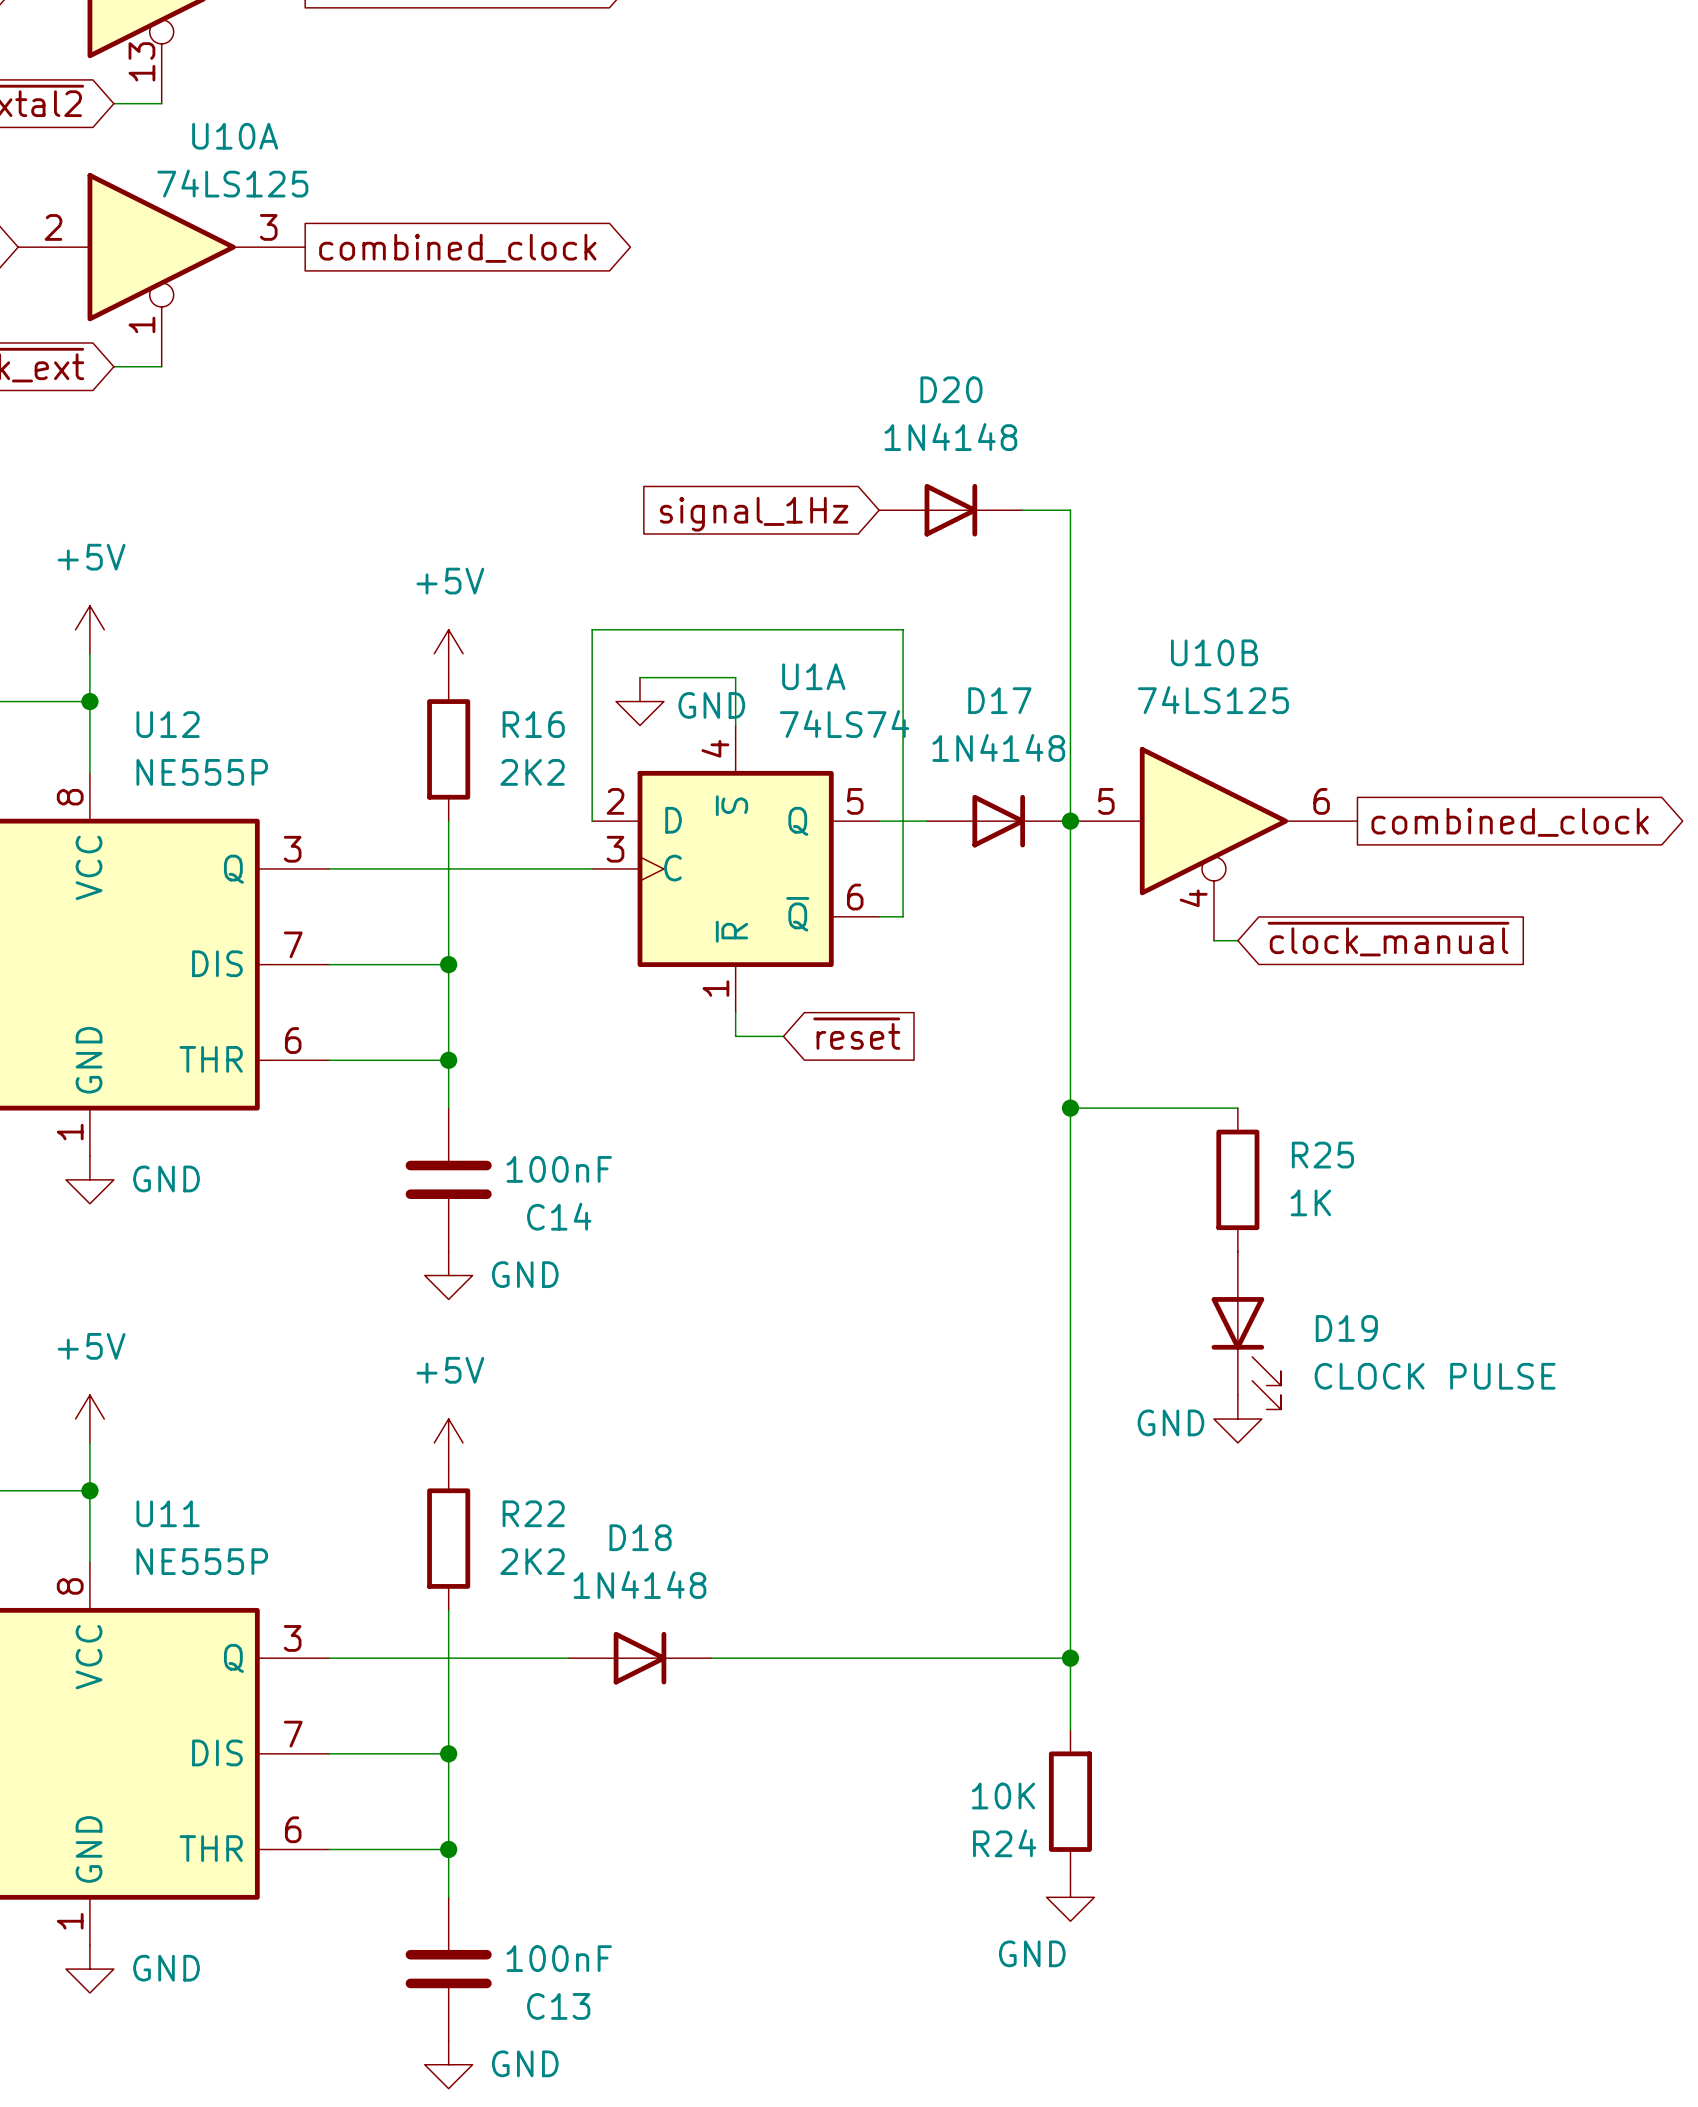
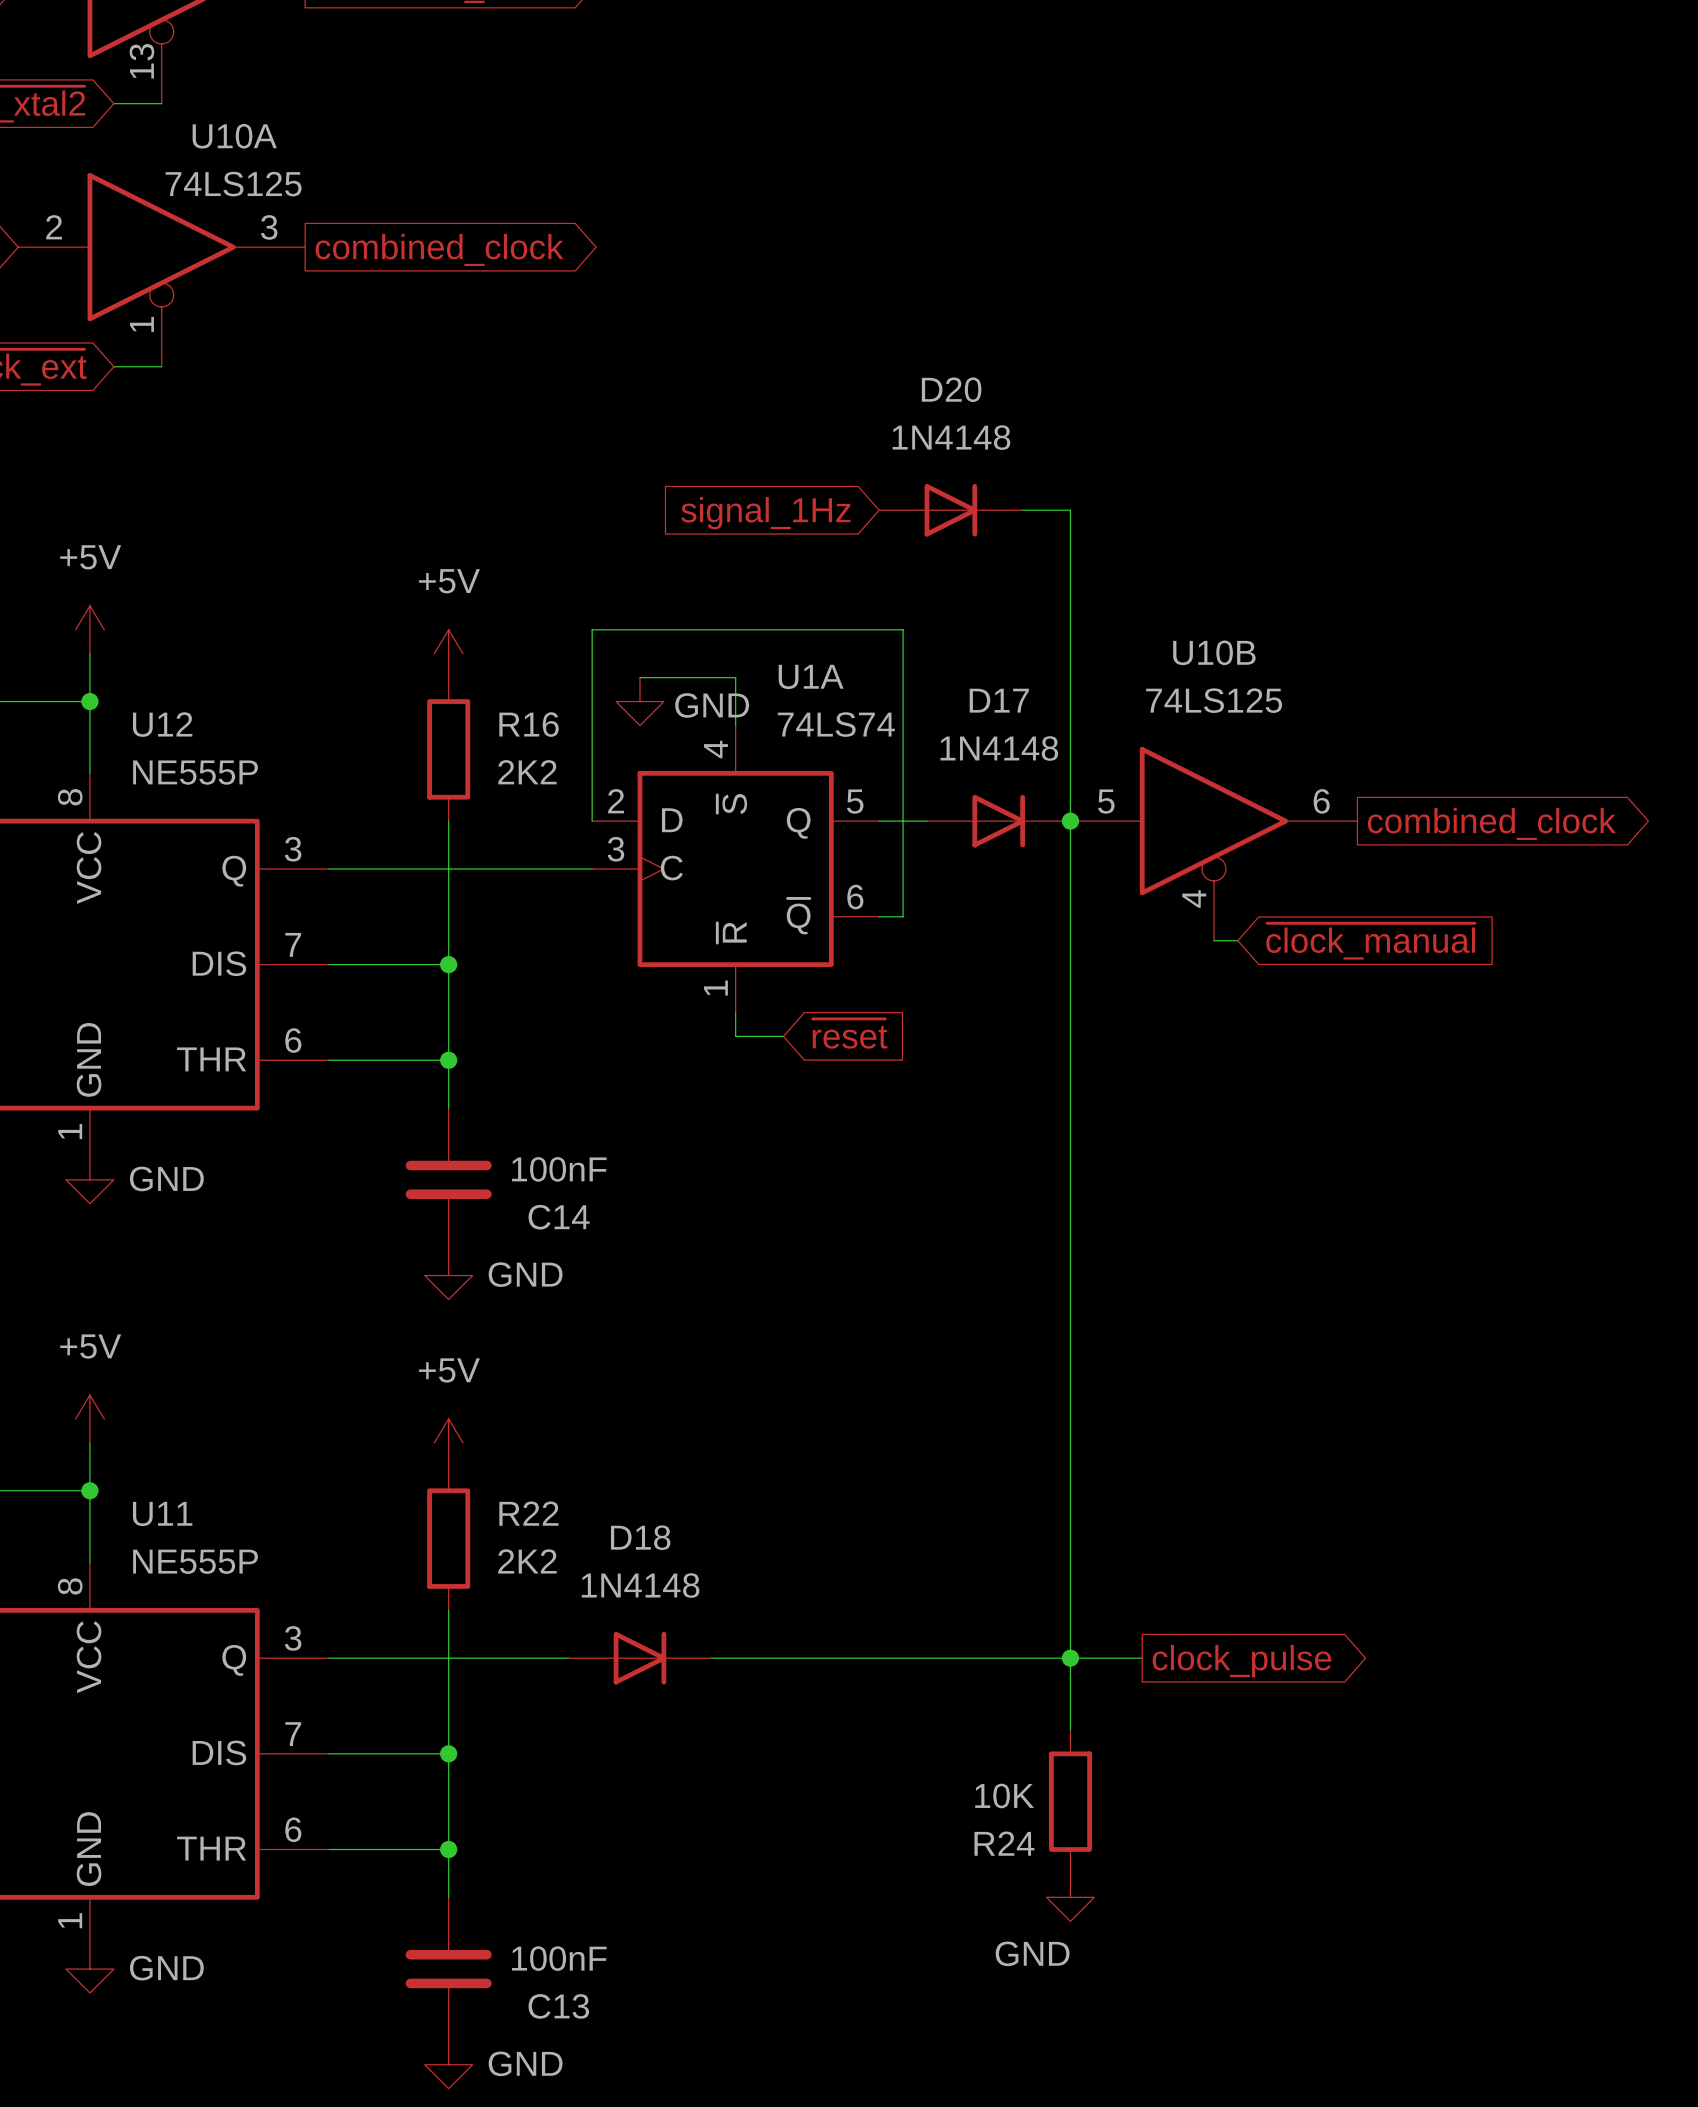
wire: (1070, 1108) (1237, 1108) -> none
junction: (1070, 1108) -> none
R25: 1K (1237, 1179) -> none
D19: CLOCK PULSE (1246, 1330) -> none
power symbol: GND (1237, 1419) -> none
wire: none -> (1070, 1658) (1142, 1658)
global label: none -> clock_pulse (1241, 1661)

